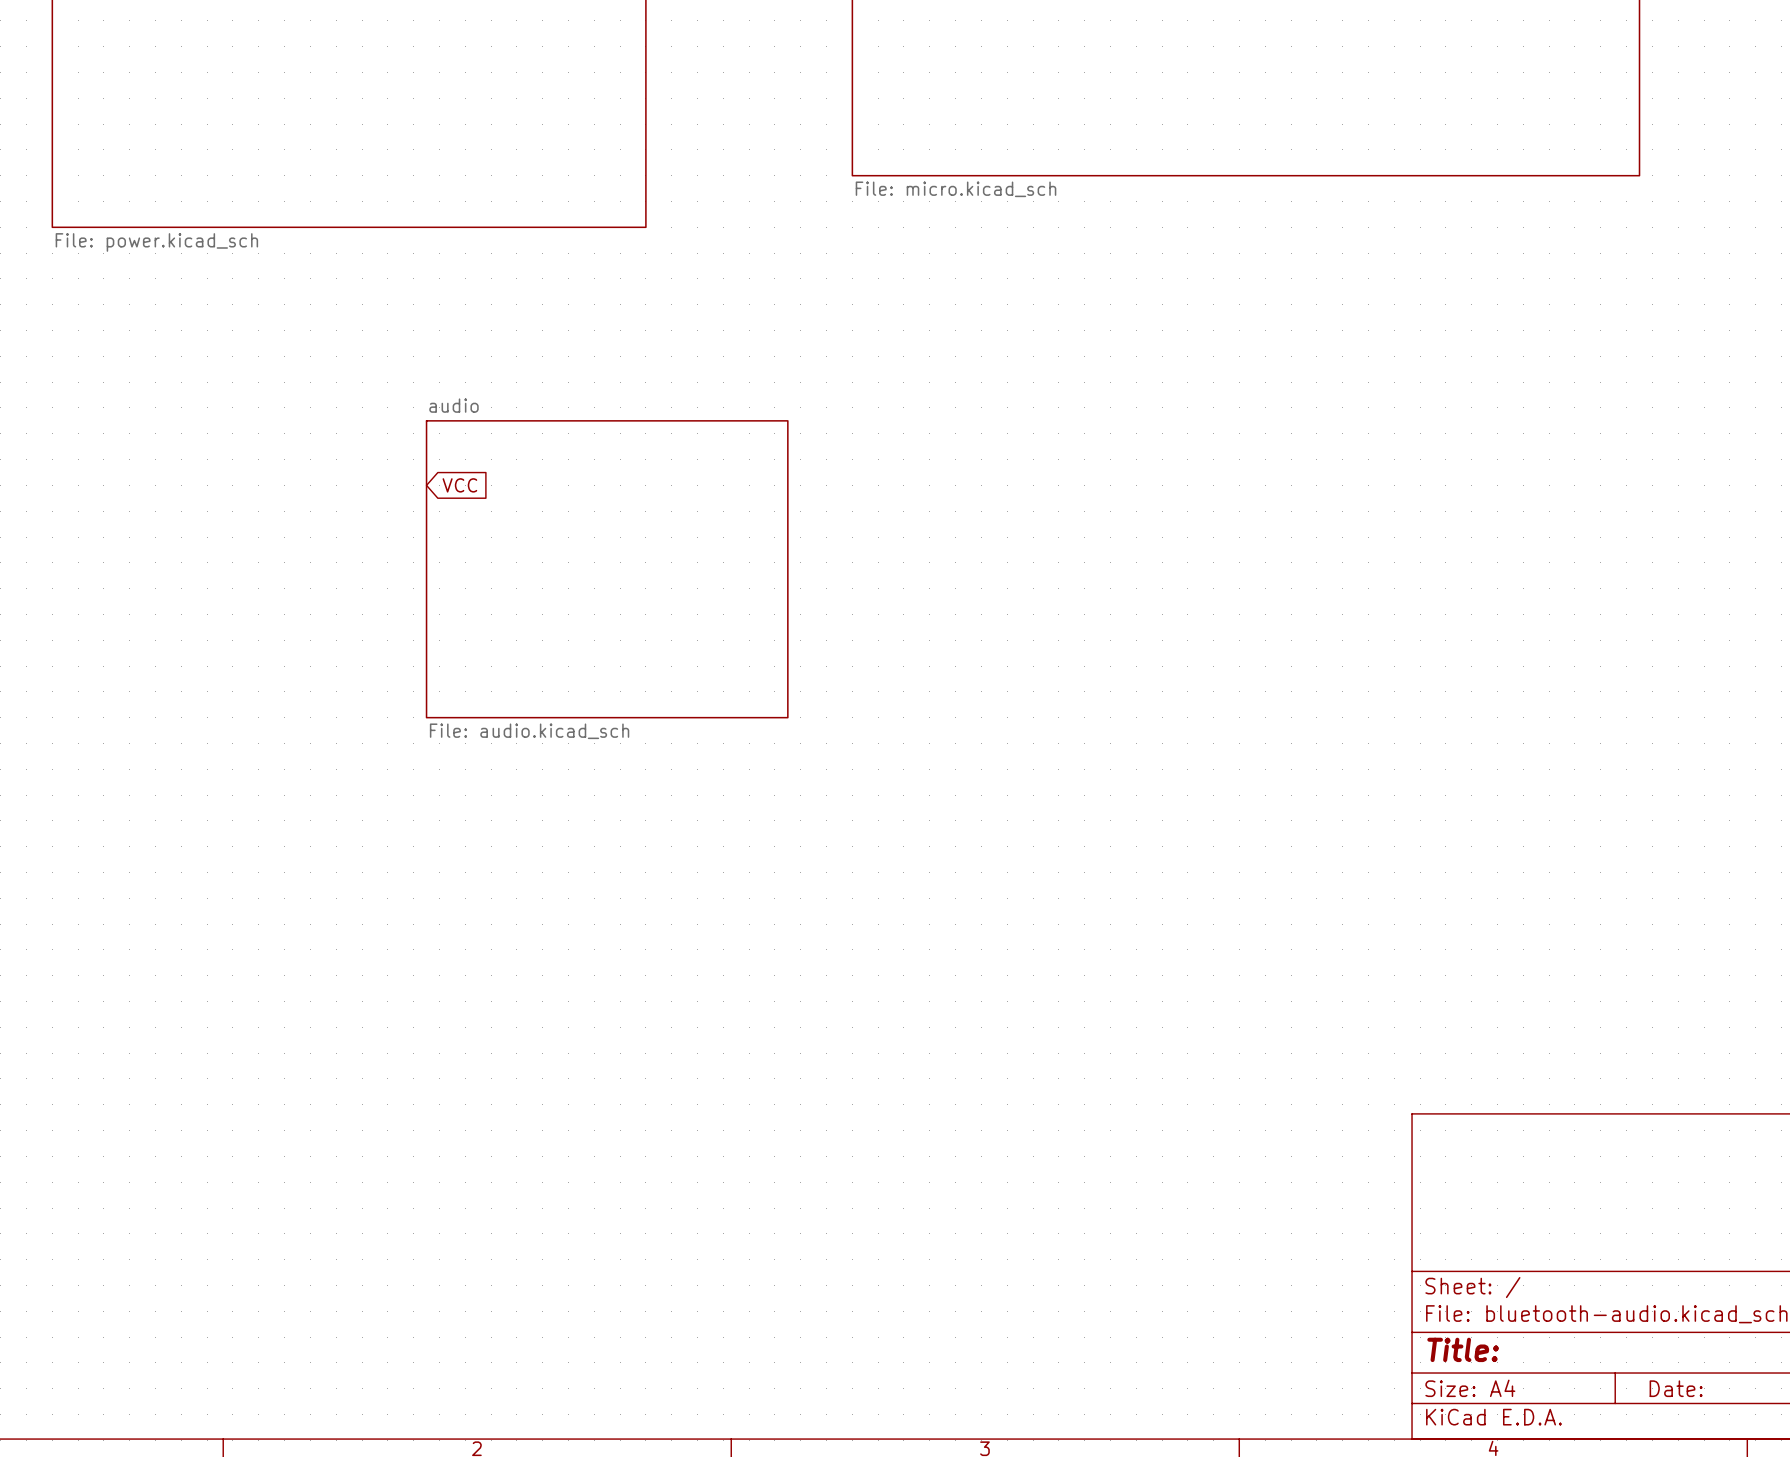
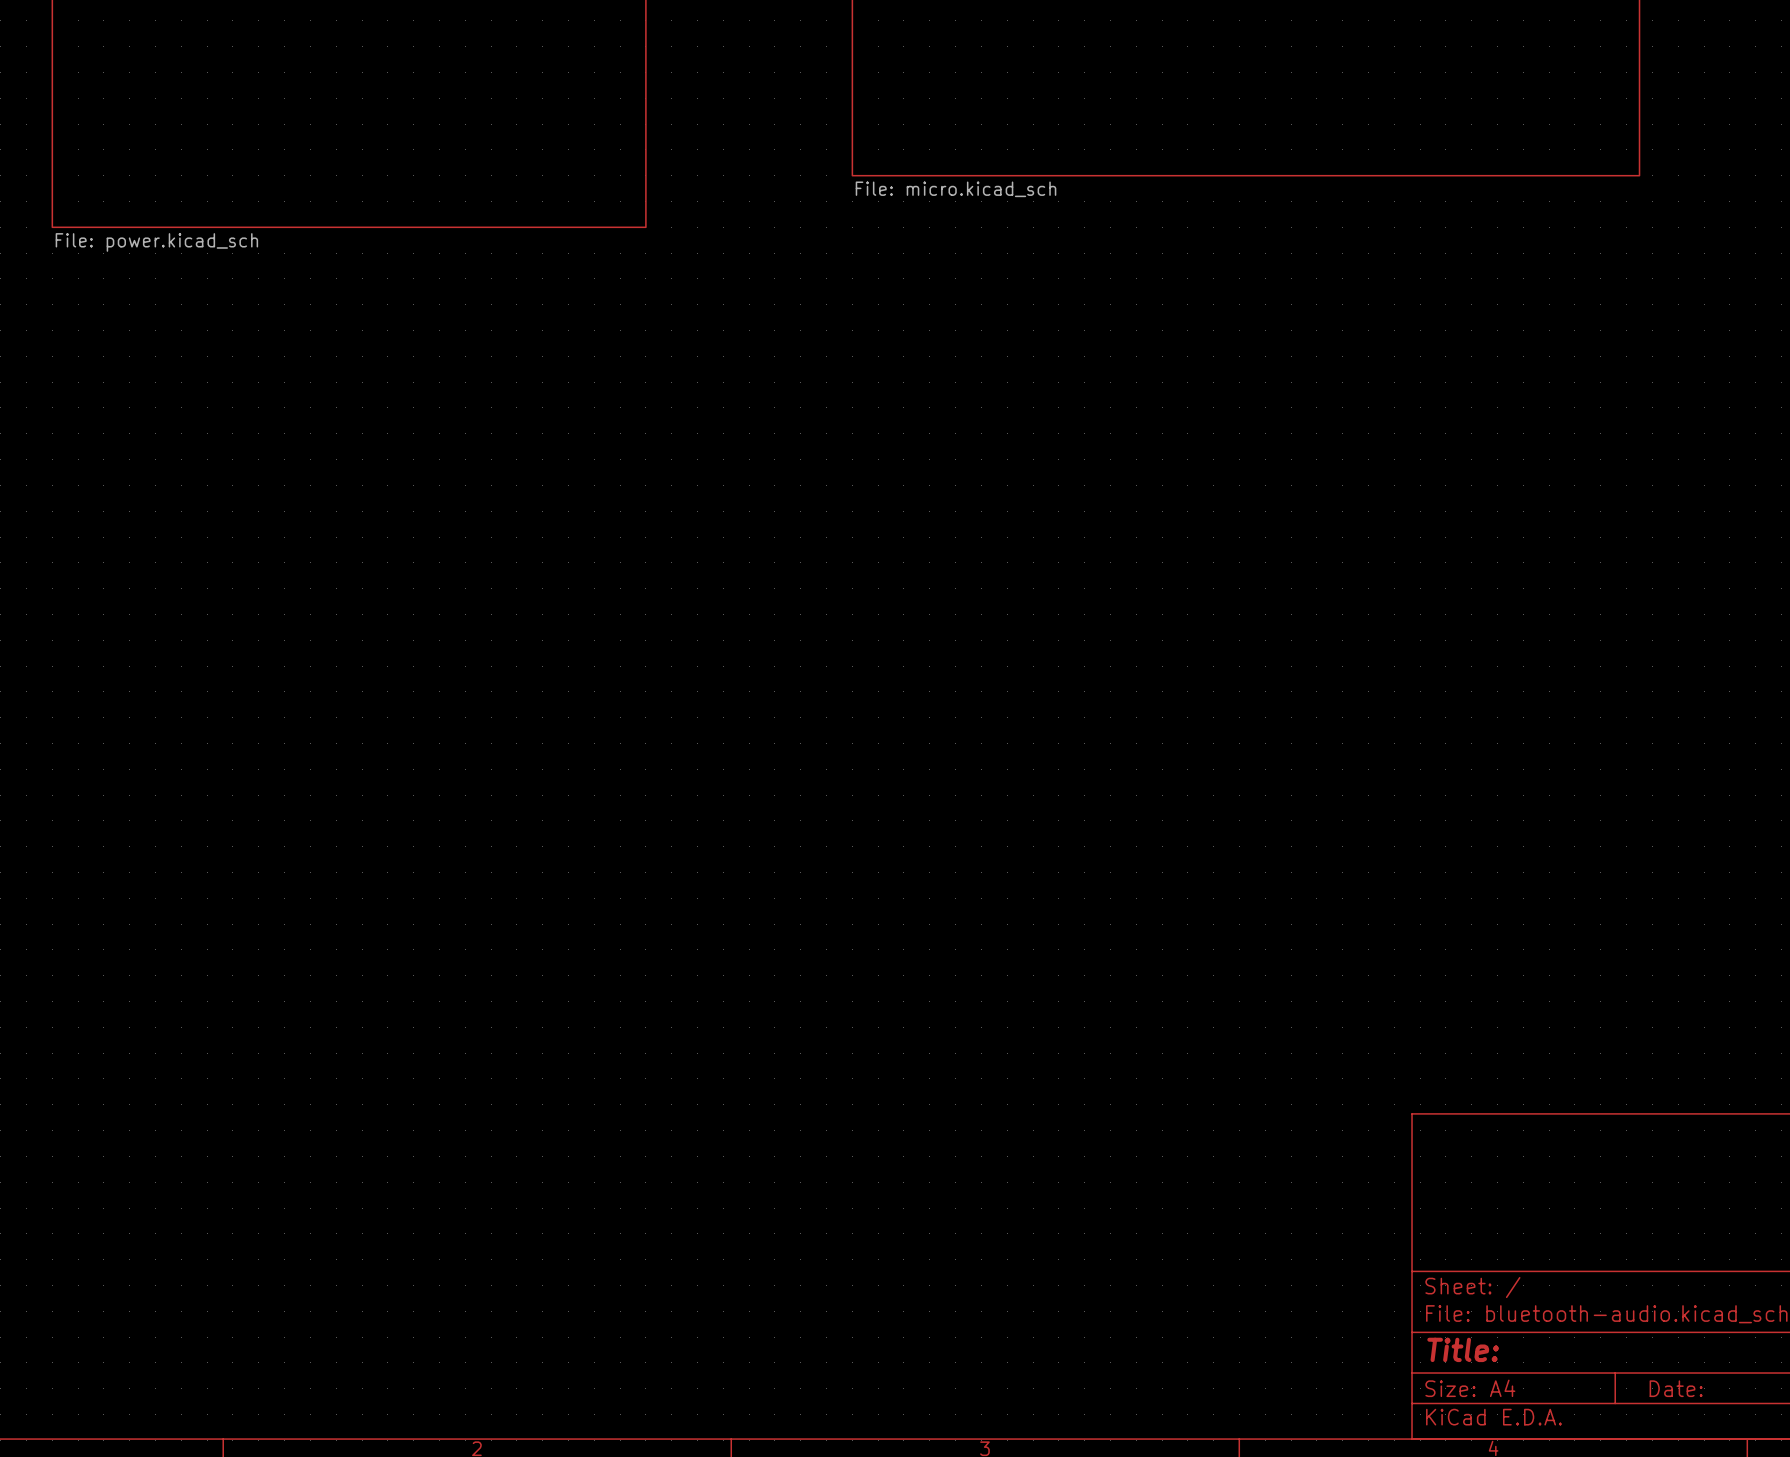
global label: VCC (459, 485) -> none
sheet audio: File: audio.kicad_sch (607, 569) -> none

